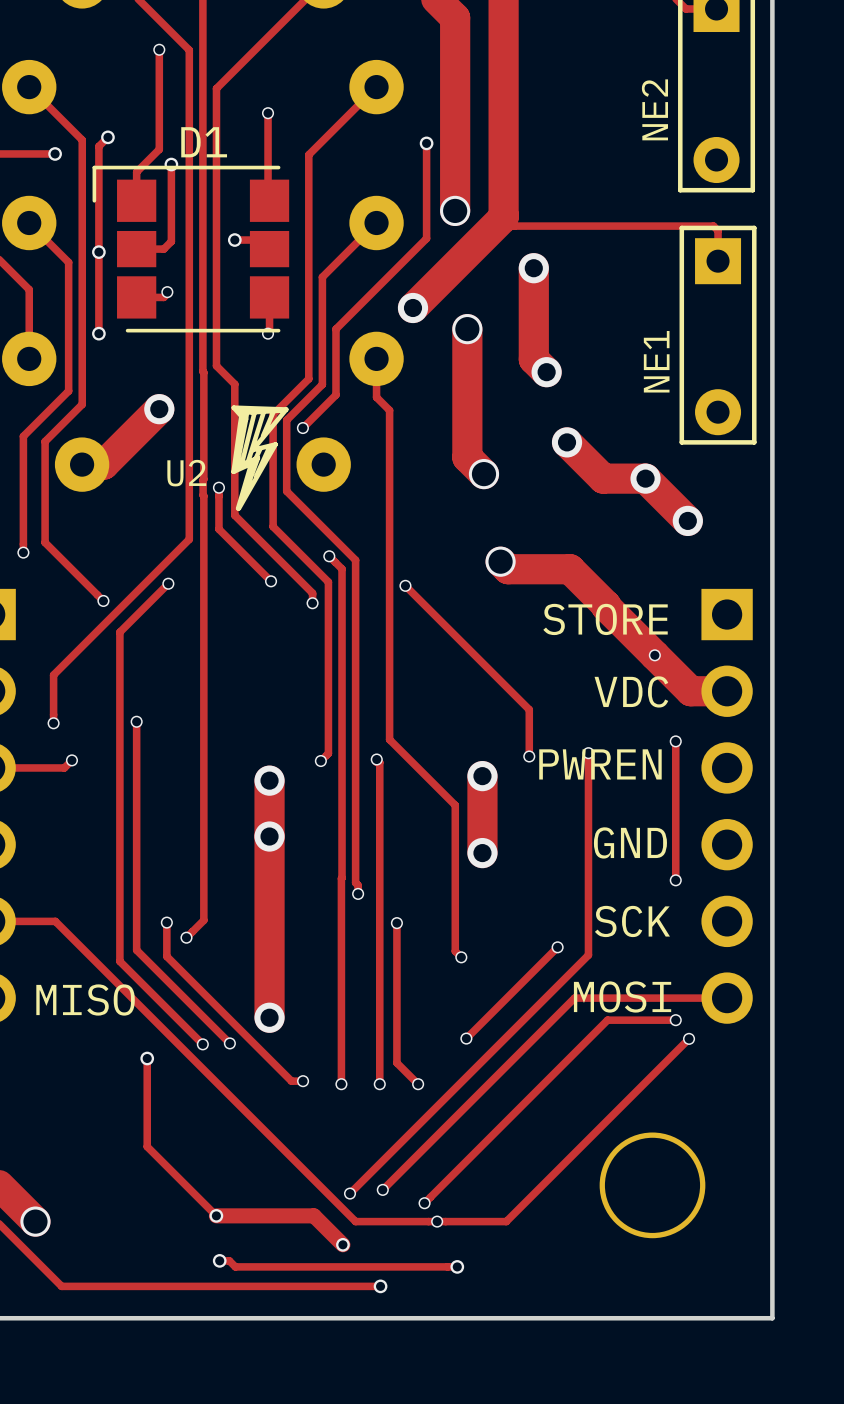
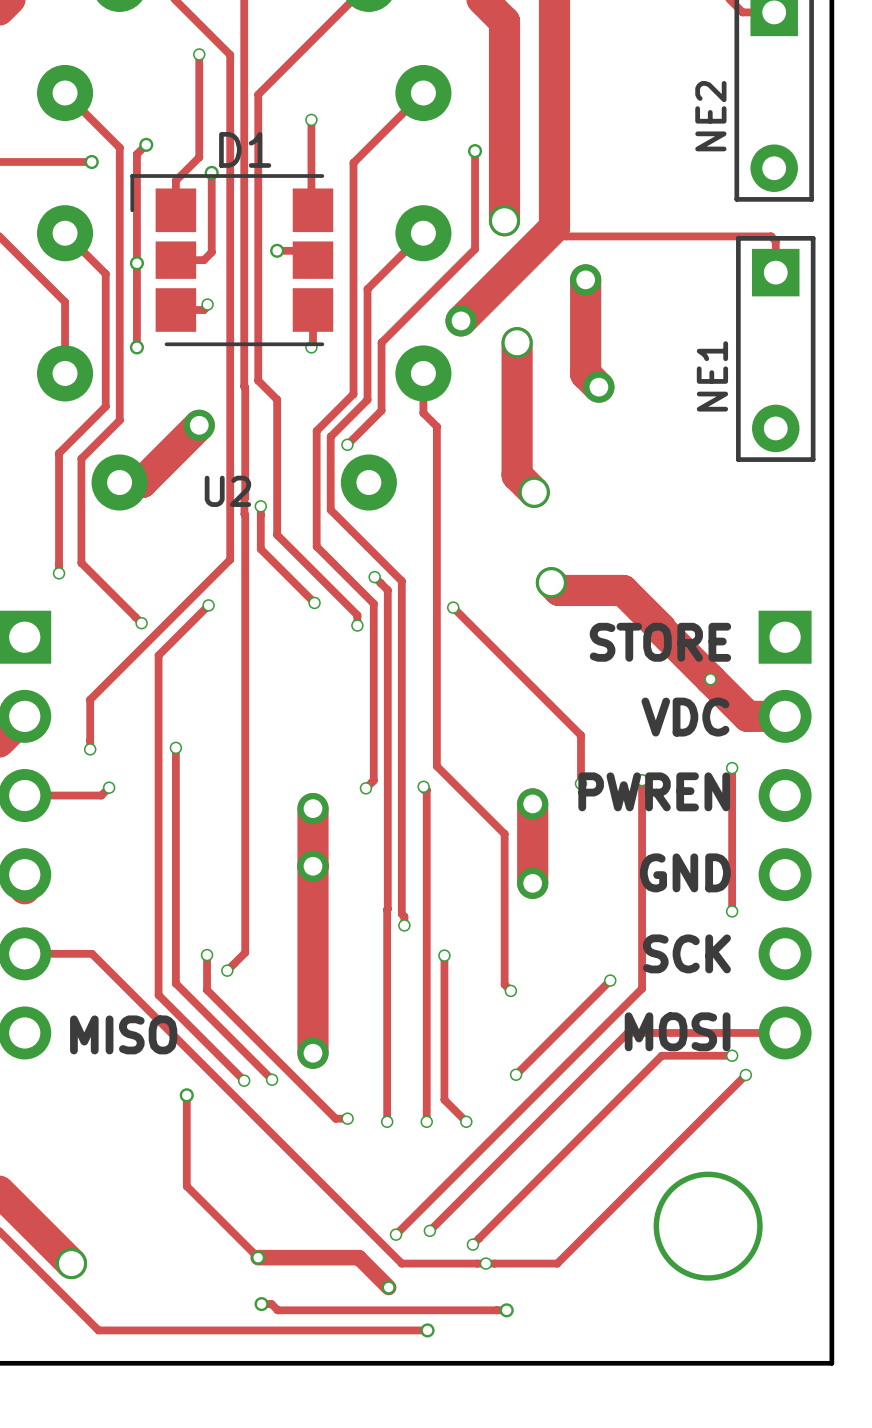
drawing: [231, 405, 289, 511] -> none
track: (567, 442) (603, 478) (645, 478) (687, 520) -> none
via: (567, 442) -> none
via: (645, 478) -> none
via: (687, 520) -> none

